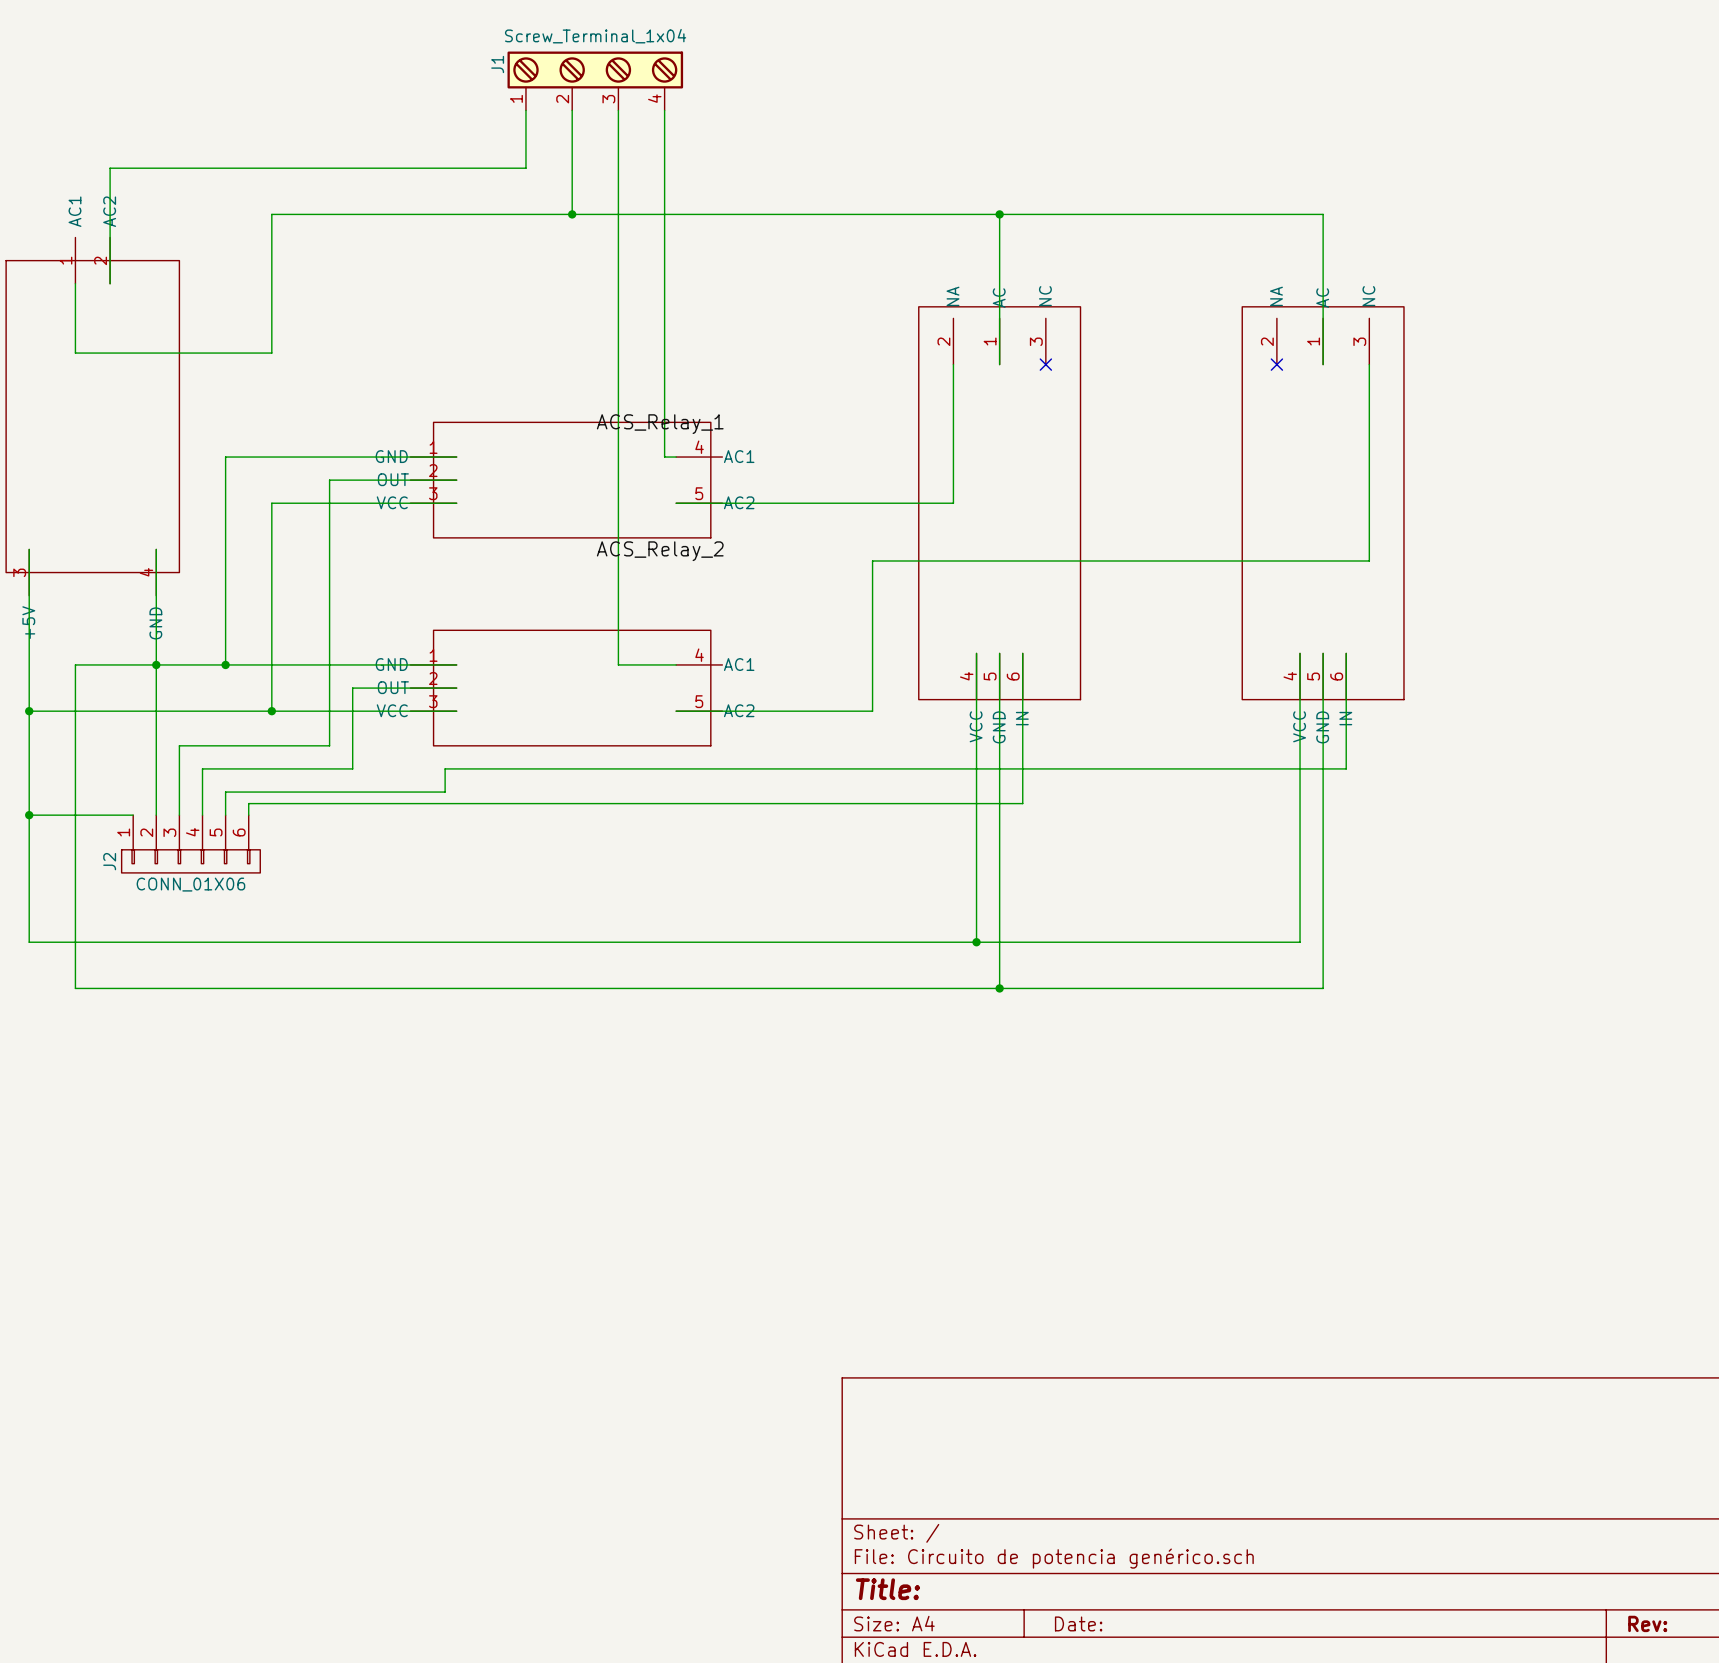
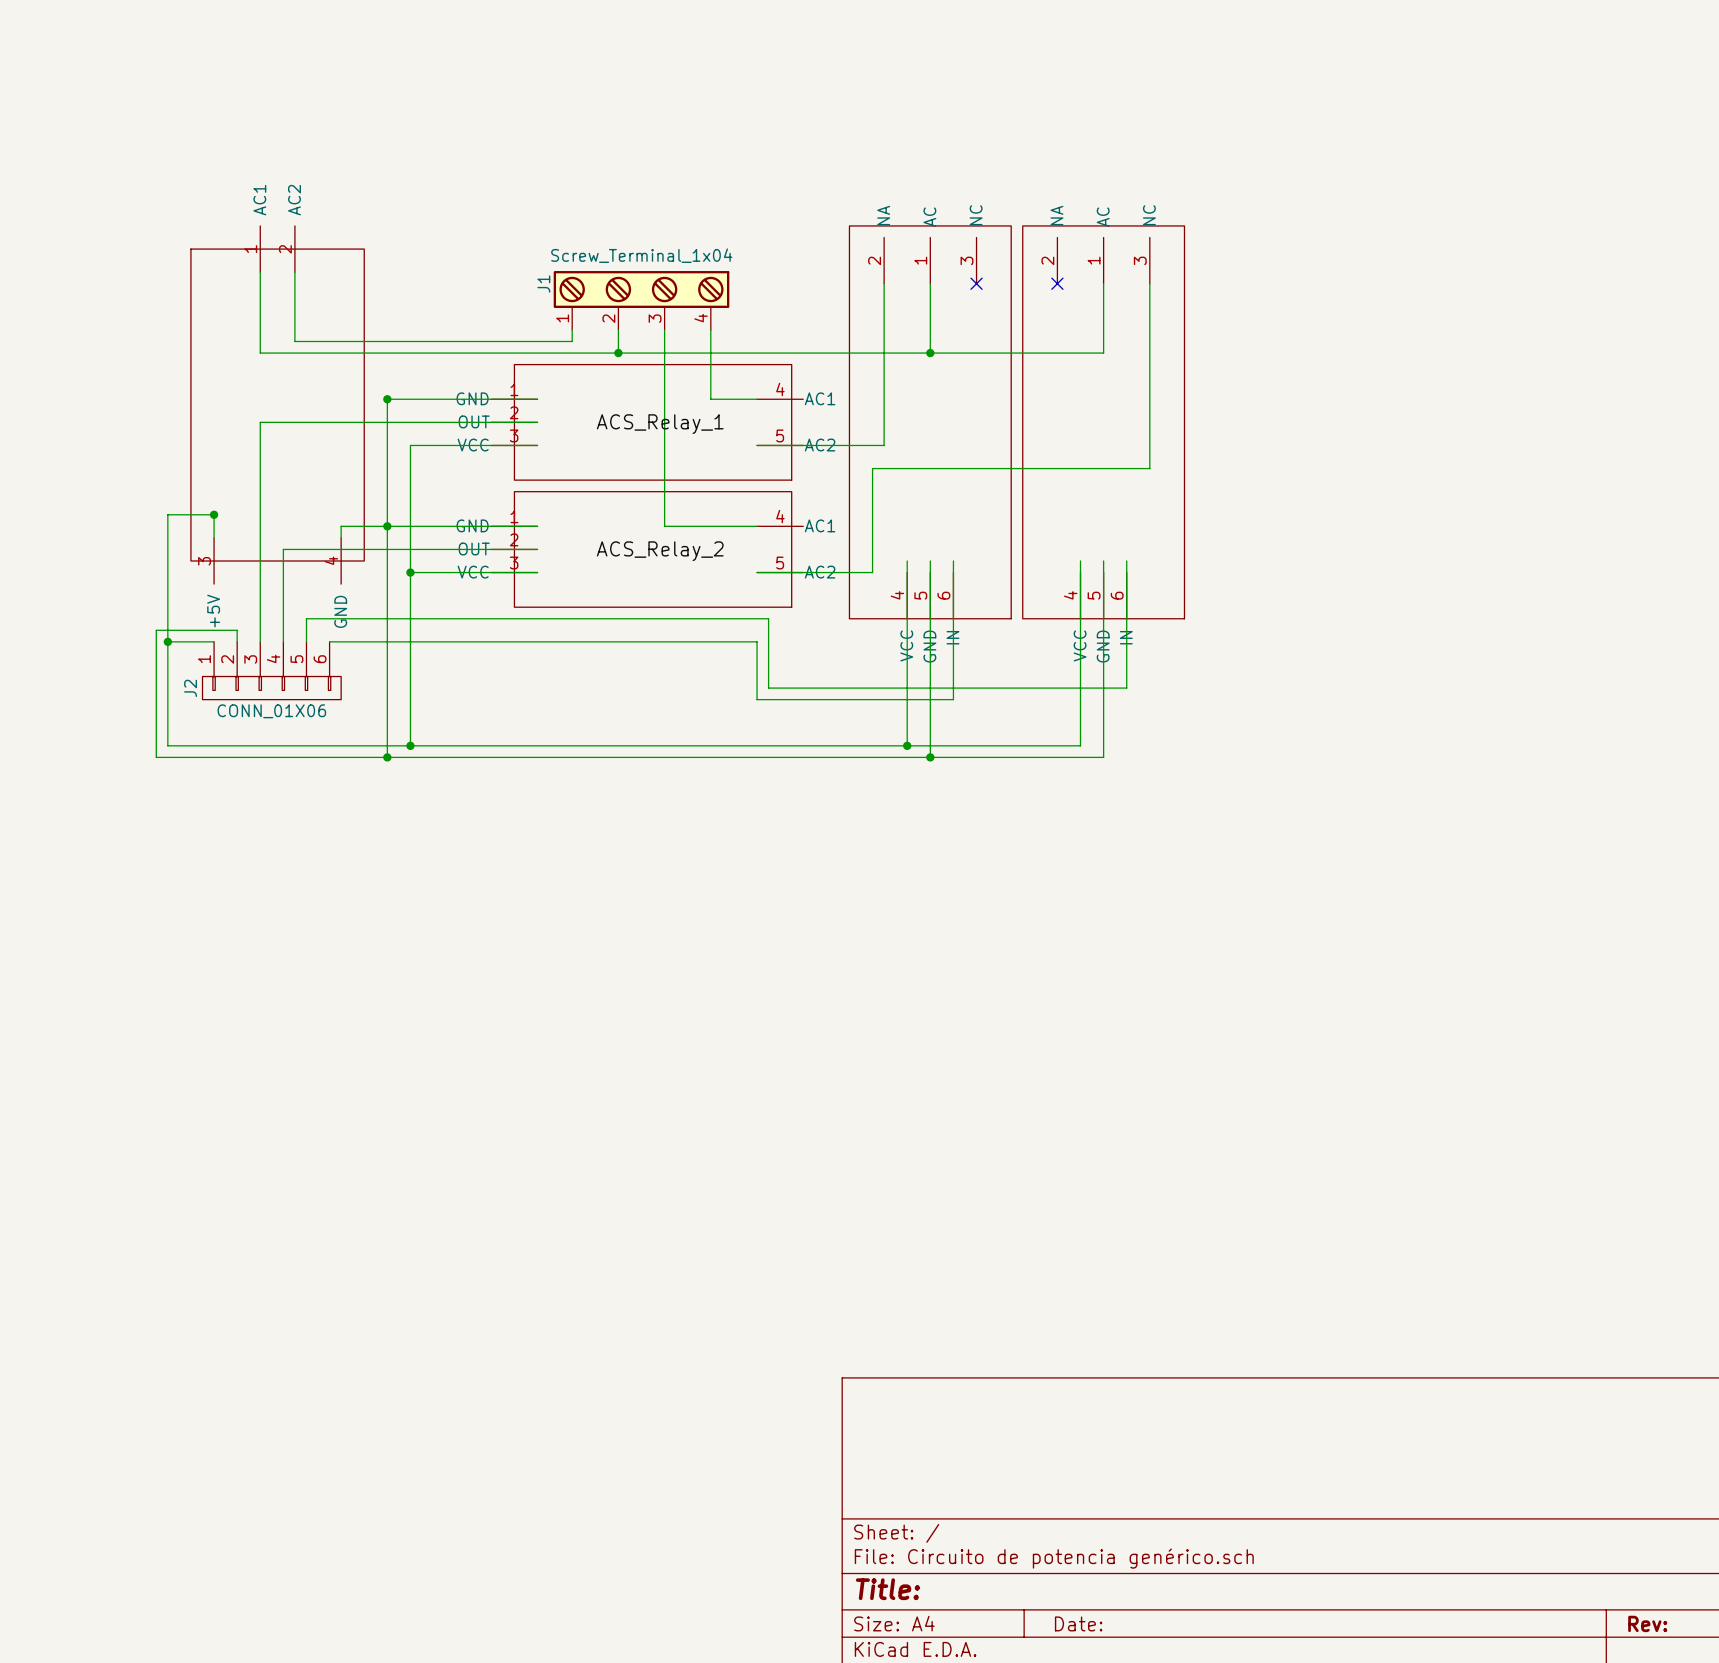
J1 position: (595, 80) -> (641, 300)
wire: (525, 110) (525, 168) (110, 168) (110, 283) -> none
wire: (572, 110) (572, 214) -> none
wire: (618, 110) (618, 329) -> none
wire: (664, 110) (664, 329) -> none
junction: (572, 214) -> none
wire: (999, 214) (999, 364) -> none
junction: (999, 214) -> none
wire: none -> (294, 272) (294, 341) (572, 341) (572, 329)
wire: (75, 283) (75, 353) (260, 353) -> (260, 272) (260, 353)
wire: none -> (884, 283) (884, 445) (757, 445)
wire: none -> (930, 283) (930, 353)
no-connect mark: none -> (976, 283)
no-connect mark: none -> (1057, 283)
wire: none -> (710, 329) (710, 399) (757, 399)
wire: (271, 353) (271, 214) (1323, 214) (1323, 364) -> (271, 353) (1103, 353) (1103, 283)
wire: (618, 353) (618, 664) (676, 664) -> none
junction: none -> (618, 353)
junction: none -> (930, 353)
wire: (953, 364) (953, 503) (676, 503) -> none
no-connect mark: (1045, 364) -> none
no-connect mark: (1276, 364) -> none
wire: (1369, 364) (1369, 560) (872, 560) -> (1149, 283) (1149, 468) (872, 468) (872, 560)
junction: none -> (387, 399)
wire: none -> (537, 399) (387, 399) (387, 757)
part position: (92, 416) -> (277, 405)
wire: none -> (537, 422) (260, 422) (260, 641)
part: none -> (647, 422)
part: none -> (930, 422)
part: none -> (1103, 422)
wire: none -> (537, 445) (410, 445) (410, 745)
wire: (456, 457) (225, 457) (225, 664) -> none
wire: (664, 457) (676, 457) -> (664, 457) (664, 526) (757, 526)
wire: (456, 480) (329, 480) (329, 745) -> (1080, 560) (1080, 745) (329, 745)
part: (566, 480) -> none
wire: (456, 503) (271, 503) (271, 711) -> none
part: (999, 503) -> none
part: (1323, 503) -> none
junction: none -> (214, 514)
junction: none -> (387, 526)
wire: none -> (537, 526) (341, 526) (341, 537)
wire: (29, 549) (29, 942) (1300, 942) (1300, 653) -> none
wire: (156, 549) (156, 630) -> (237, 641) (237, 630) (156, 630)
wire: none -> (537, 549) (283, 549) (283, 641)
part: none -> (647, 549)
wire: none -> (907, 560) (907, 745)
wire: none -> (930, 560) (930, 757)
wire: none -> (953, 560) (953, 699) (757, 699) (757, 641) (329, 641)
wire: none -> (1126, 560) (1126, 688) (768, 688) (768, 618) (306, 618) (306, 641)
wire: none -> (410, 572) (537, 572)
junction: none -> (410, 572)
wire: (872, 572) (872, 711) (676, 711) -> (872, 572) (757, 572)
wire: none -> (167, 641) (214, 641)
wire: (976, 653) (976, 942) -> none
wire: (999, 653) (999, 988) -> none
wire: (1022, 653) (1022, 803) (248, 803) (248, 815) -> none
wire: (1323, 653) (1323, 988) (75, 988) (75, 664) (456, 664) -> none
wire: (1346, 653) (1346, 768) (445, 768) (445, 792) (225, 792) (225, 815) -> none
junction position: (156, 664) -> (167, 641)
junction: (225, 664) -> none
wire: (456, 688) (352, 688) (352, 768) (202, 768) (202, 815) -> none
part: (566, 688) -> none
wire: (29, 711) (456, 711) -> none
junction: (29, 711) -> none
junction: (271, 711) -> none
wire: (179, 745) (179, 815) -> (179, 745) (167, 745) (167, 514) (214, 514) (214, 537)
junction: none -> (410, 745)
junction: none -> (907, 745)
wire: (156, 757) (156, 815) -> (156, 757) (1103, 757) (1103, 560)
junction: none -> (387, 757)
junction: none -> (930, 757)
wire: (29, 815) (133, 815) -> none
junction: (29, 815) -> none
J2 position: (190, 844) -> (271, 670)
junction: (976, 942) -> none
junction: (999, 988) -> none

